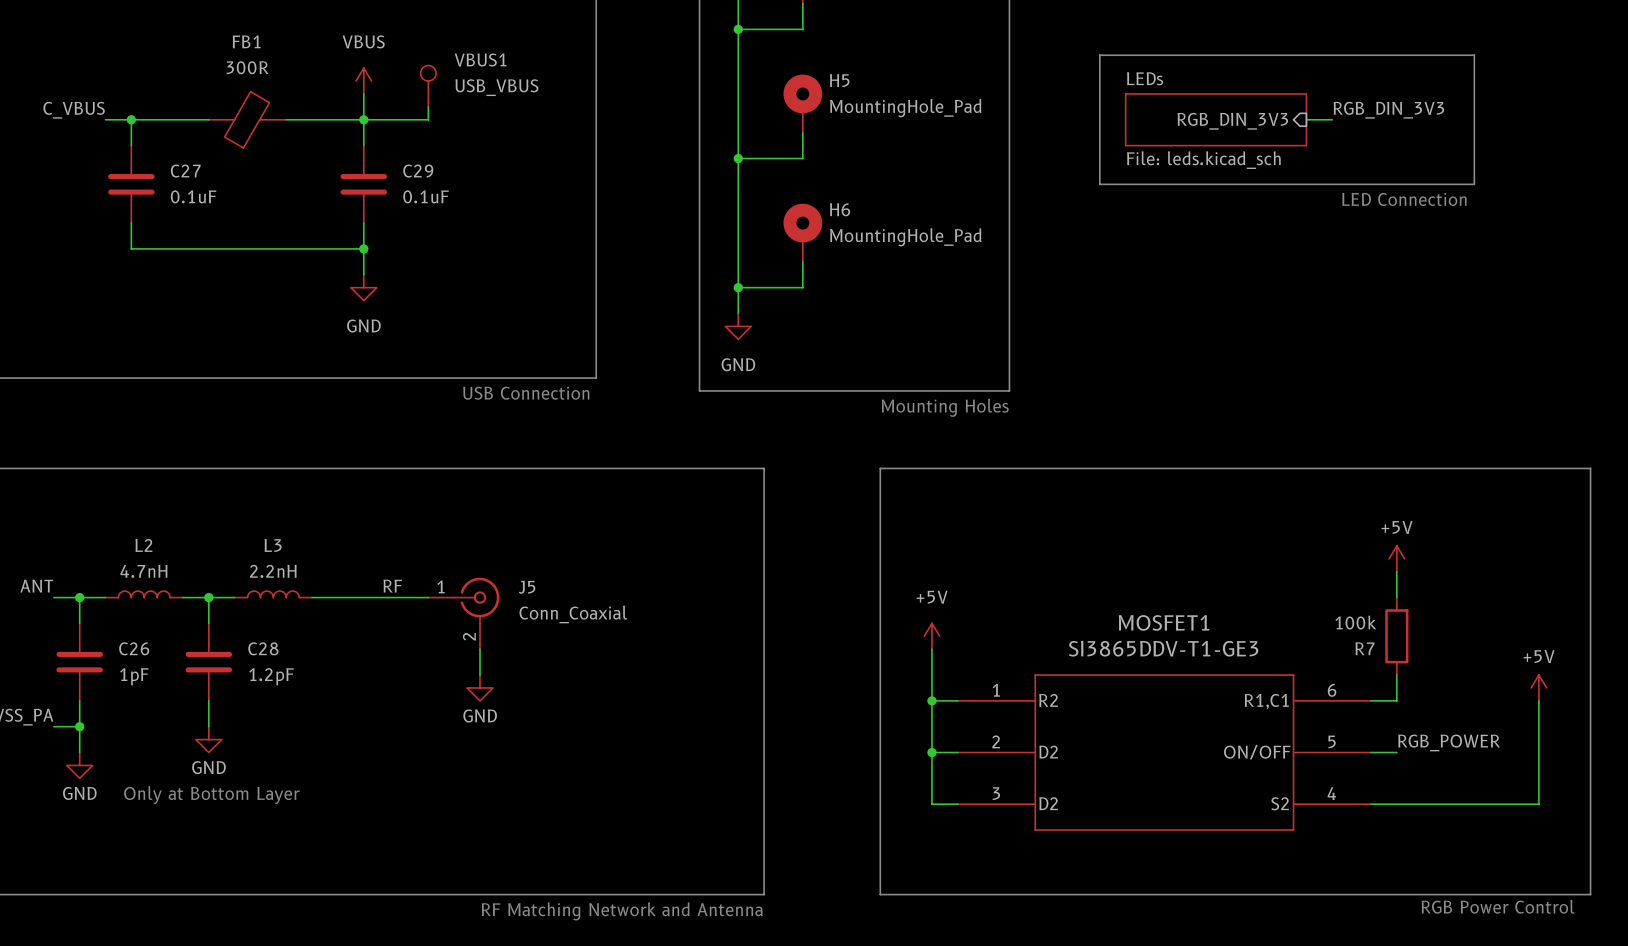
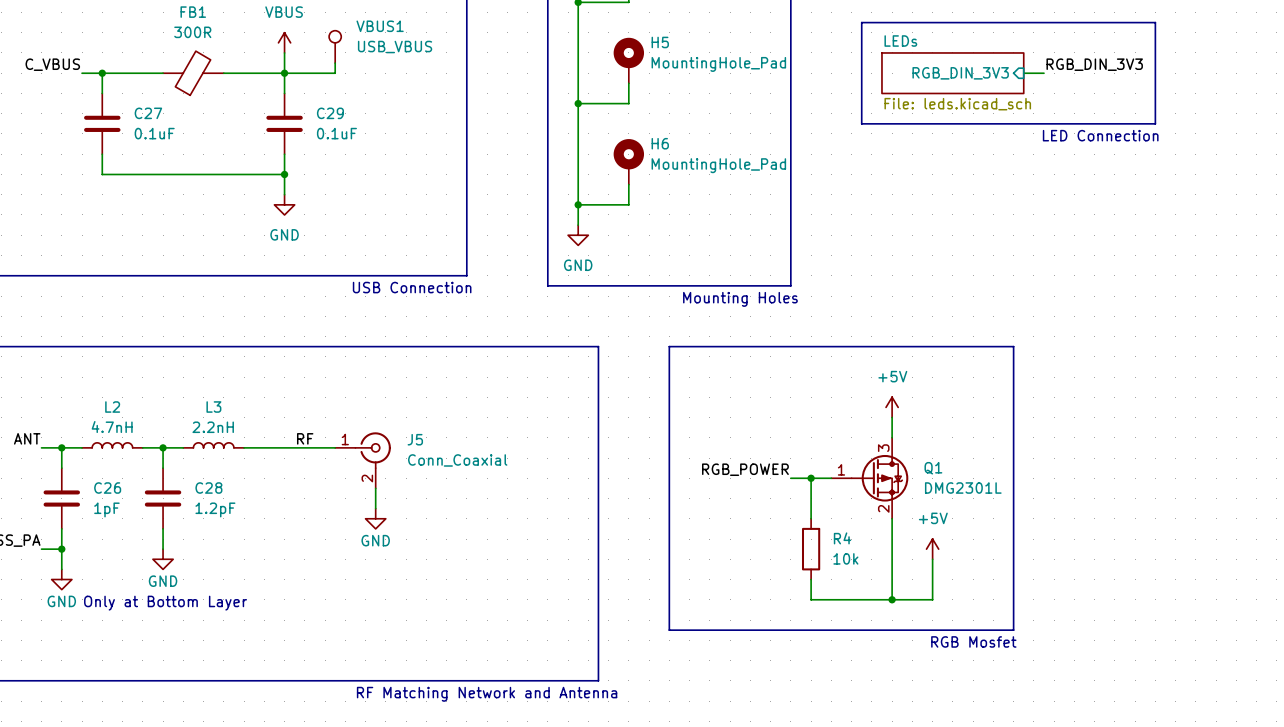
line: (880, 468) (880, 894) (1590, 894) (1590, 468) (1293, 468) -> (689, 346) (669, 346) (669, 630) (1013, 630) (1013, 346)
power symbol: none -> +5V (892, 407)
wire: none -> (892, 417) (892, 437)
power symbol: +5V (1396, 558) -> none
wire: (1396, 571) (1396, 597) -> none
label: none -> RGB_POWER (745, 469)
power symbol: +5V (931, 636) -> none
wire: none -> (790, 478) (831, 478)
wire: none -> (811, 478) (811, 518)
junction: none -> (811, 478)
Q1: none -> DMG2301L (869, 478)
R7: 100k (1396, 636) -> none
wire: (931, 649) (931, 804) (957, 804) -> none
wire: (1396, 675) (1396, 700) (1371, 700) -> none
wire: none -> (892, 518) (892, 599)
power symbol: +5V (1538, 687) -> none
wire: (931, 700) (957, 700) -> none
junction: (931, 700) -> none
wire: (1538, 700) (1538, 804) (1371, 804) -> none
R4: none -> 10k (811, 549)
power symbol: none -> +5V (932, 549)
wire: none -> (932, 559) (932, 599) (811, 599) (811, 579)
label: RGB_POWER (1449, 742) -> none
wire: (931, 752) (957, 752) -> none
junction: (931, 752) -> none
MOSFET1: SI3865DDV-T1-GE3 (1164, 752) -> none
wire: (1371, 752) (1396, 752) -> none
junction: none -> (892, 599)
text: none -> RGB Mosfet (973, 641)
text: RGB Power Control (1498, 906) -> none

